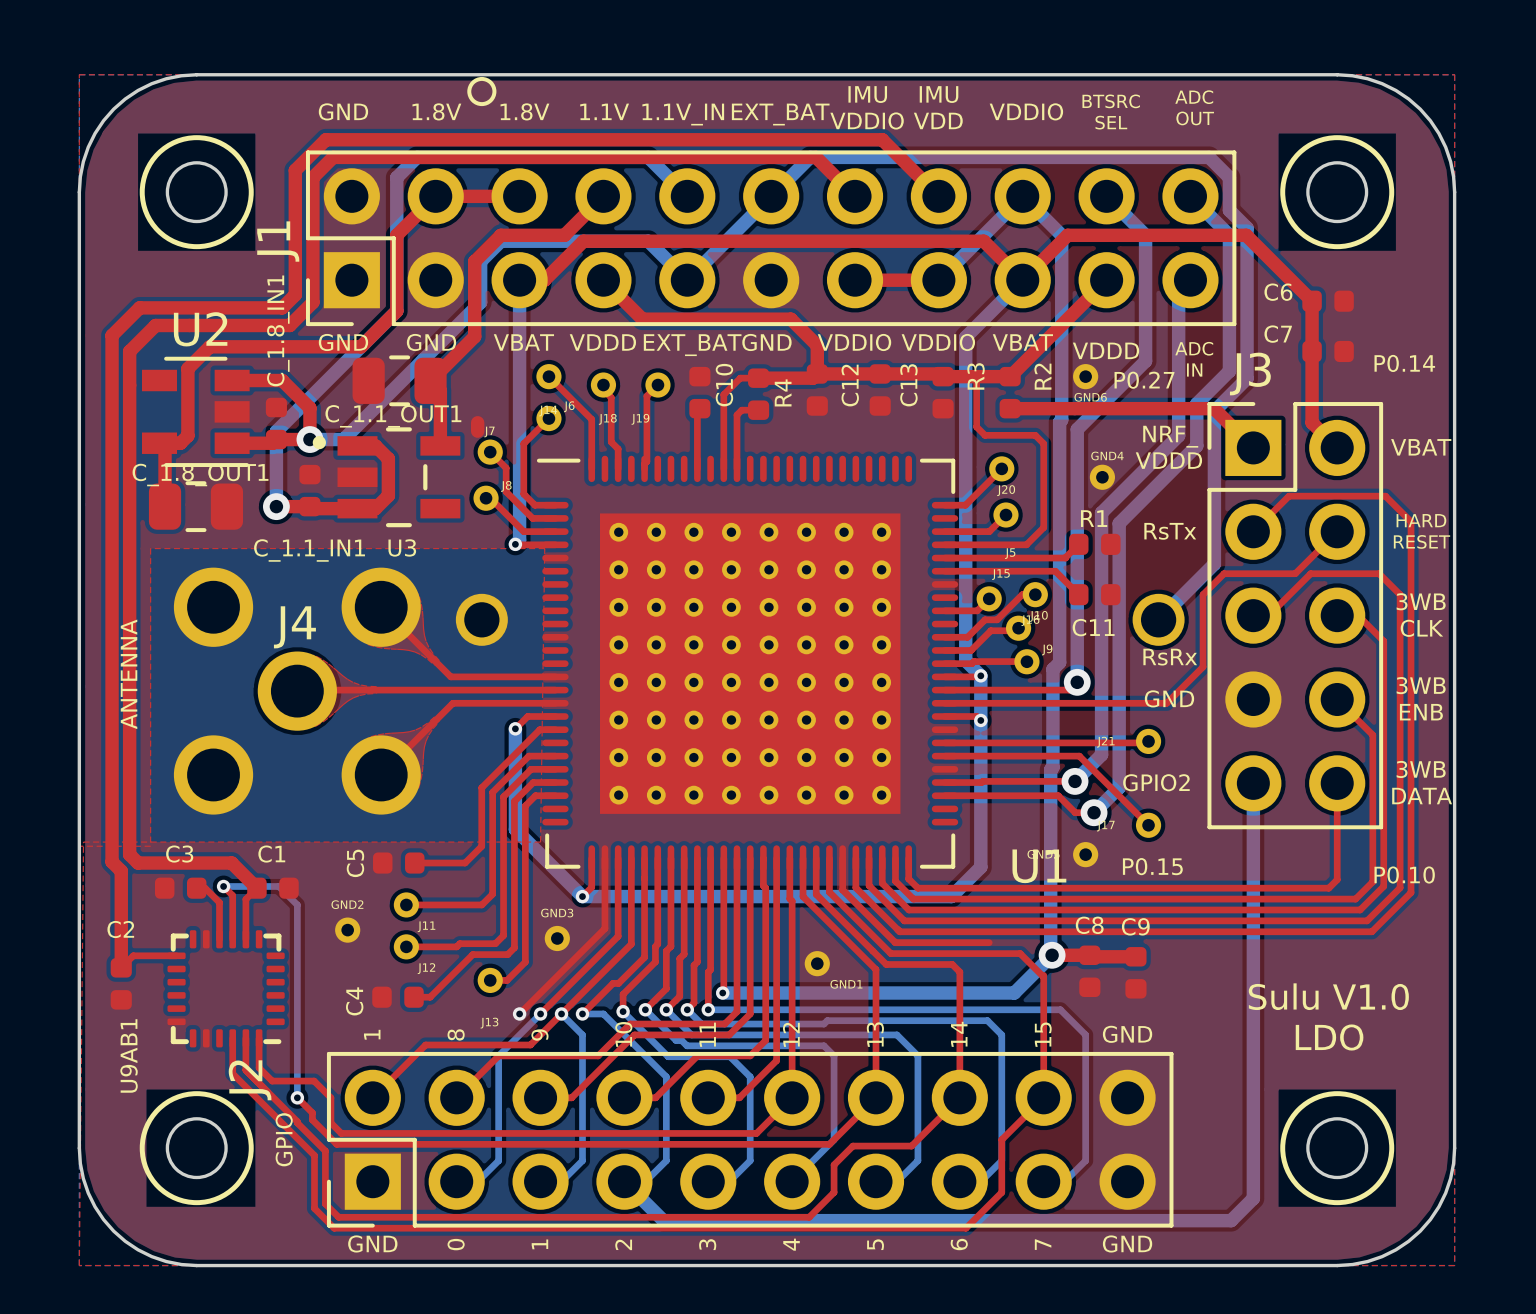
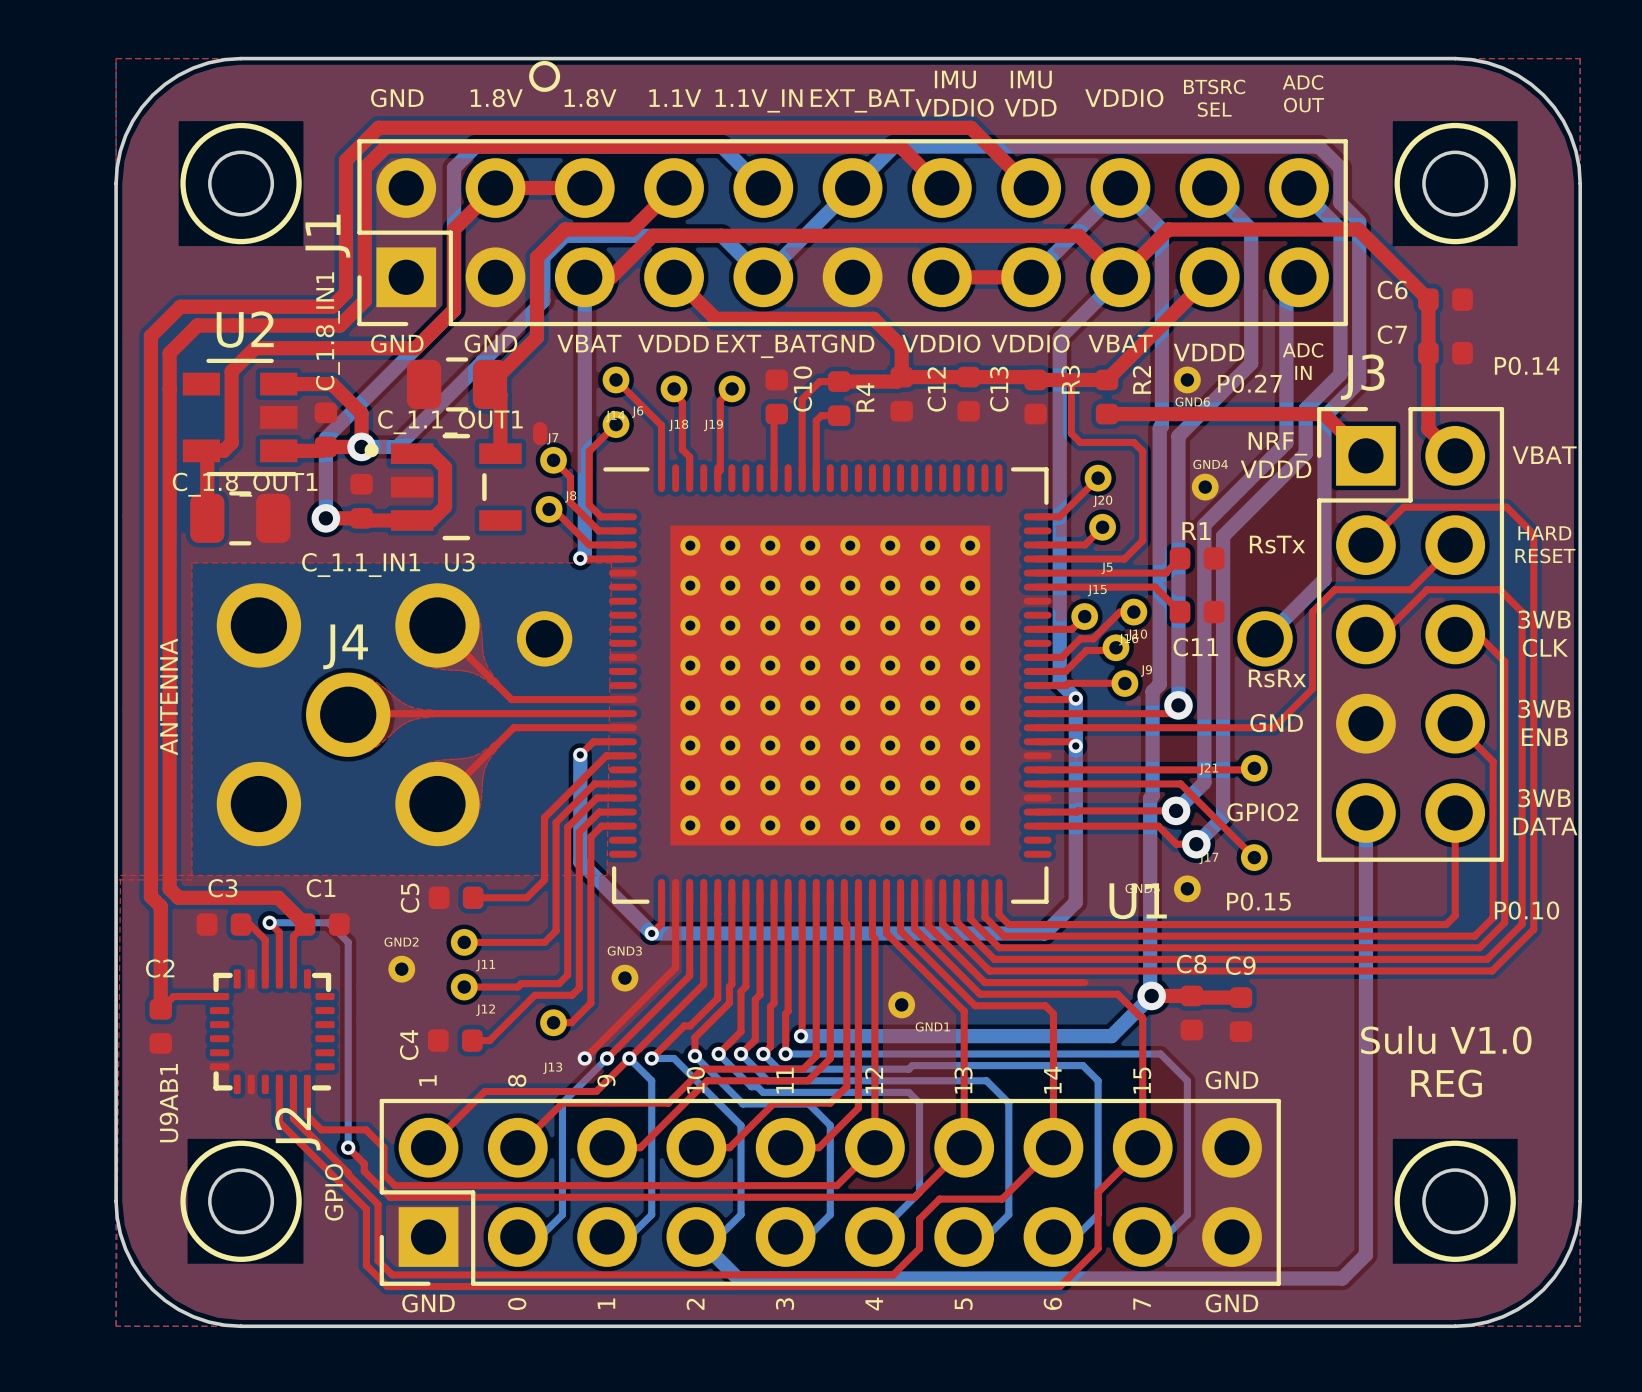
text: LDO (1329, 1037) -> REG (1446, 1083)

